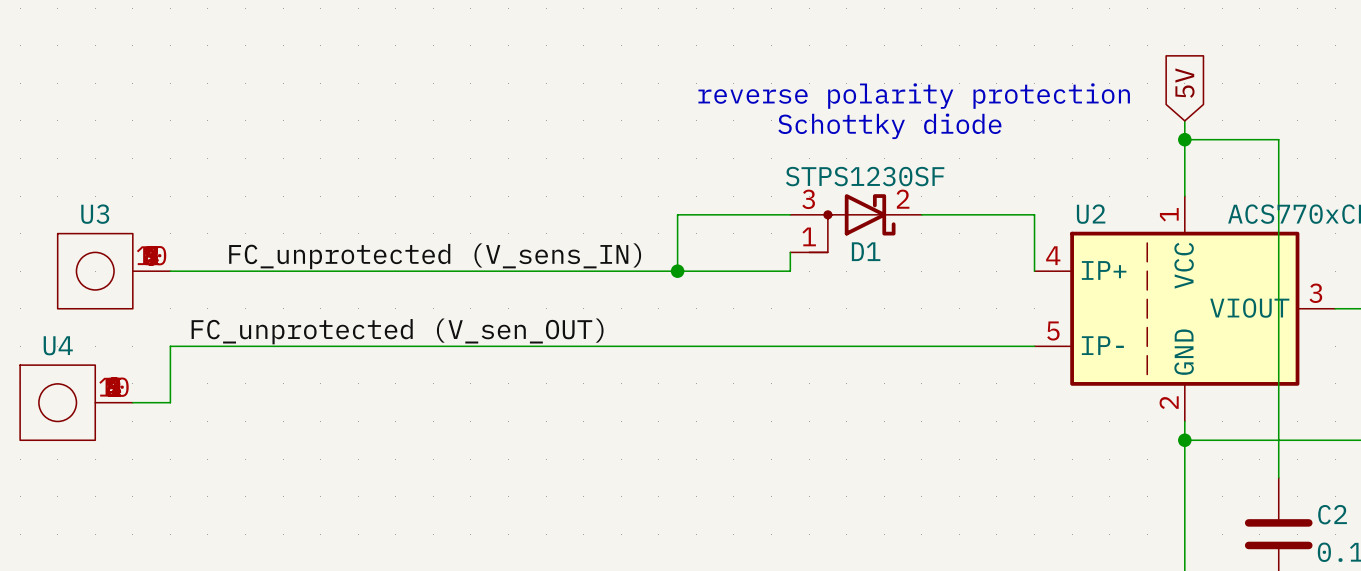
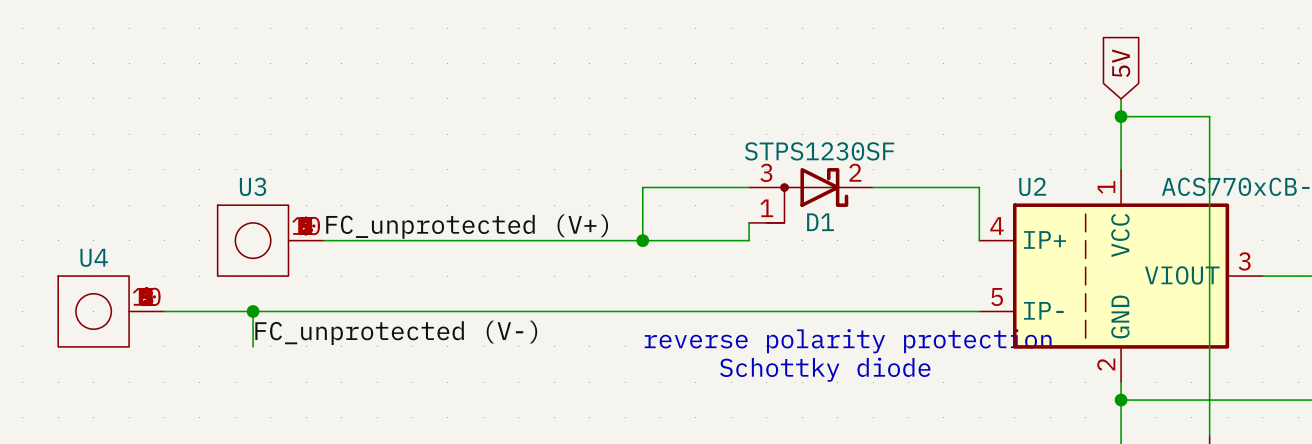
text position: reverse polarity protection (914, 96) -> reverse polarity protection (848, 341)
text position: Schottky diode (889, 126) -> Schottky diode (825, 369)
label: FC_unprotected (V_sens_IN) (435, 256) -> FC_unprotected (V+) (467, 226)
U3 position: (114, 271) -> (270, 240)
wire: (170, 271) (339, 271) -> none
label: FC_unprotected (V_sen_OUT) (397, 331) -> FC_unprotected (V-) (396, 332)
wire: (170, 346) (170, 402) (132, 402) -> none
wire: none -> (253, 311) (253, 346)
junction: none -> (253, 311)
U4 position: (76, 402) -> (111, 311)

